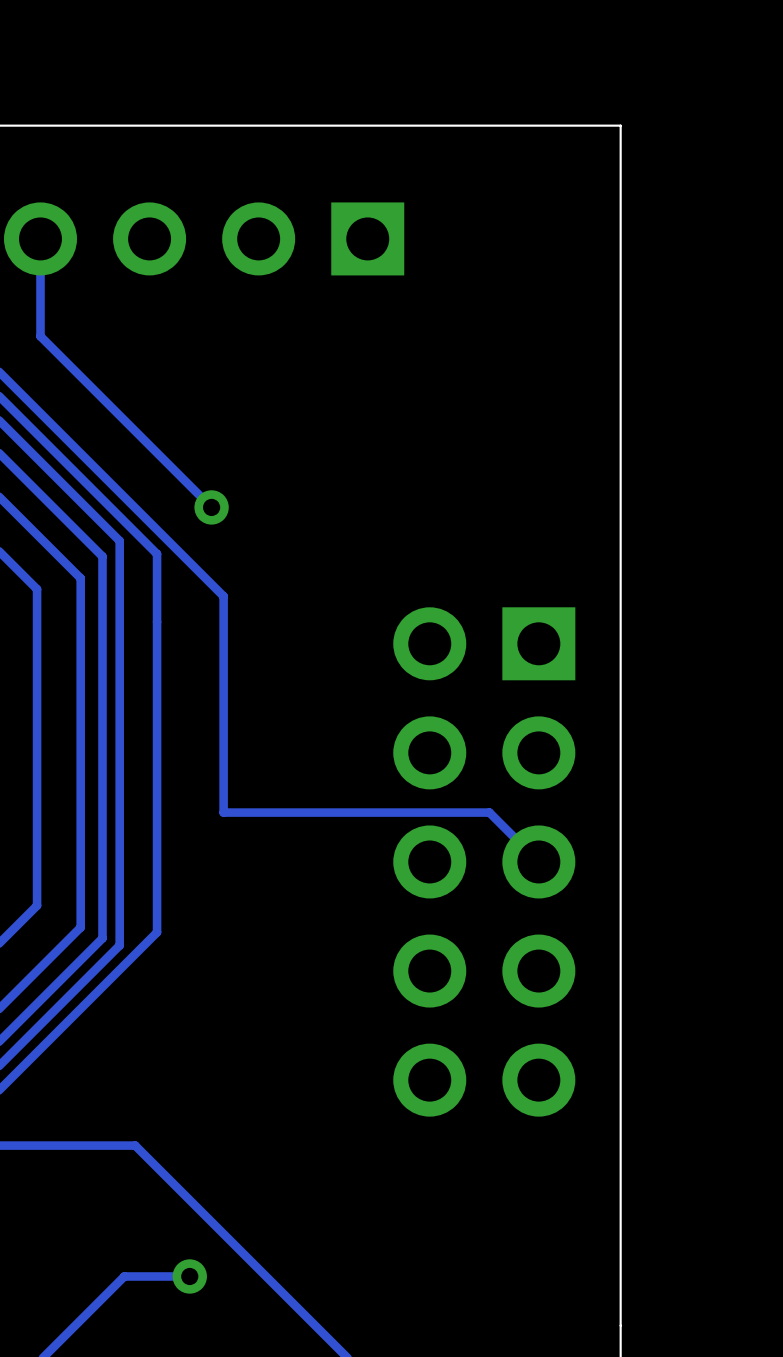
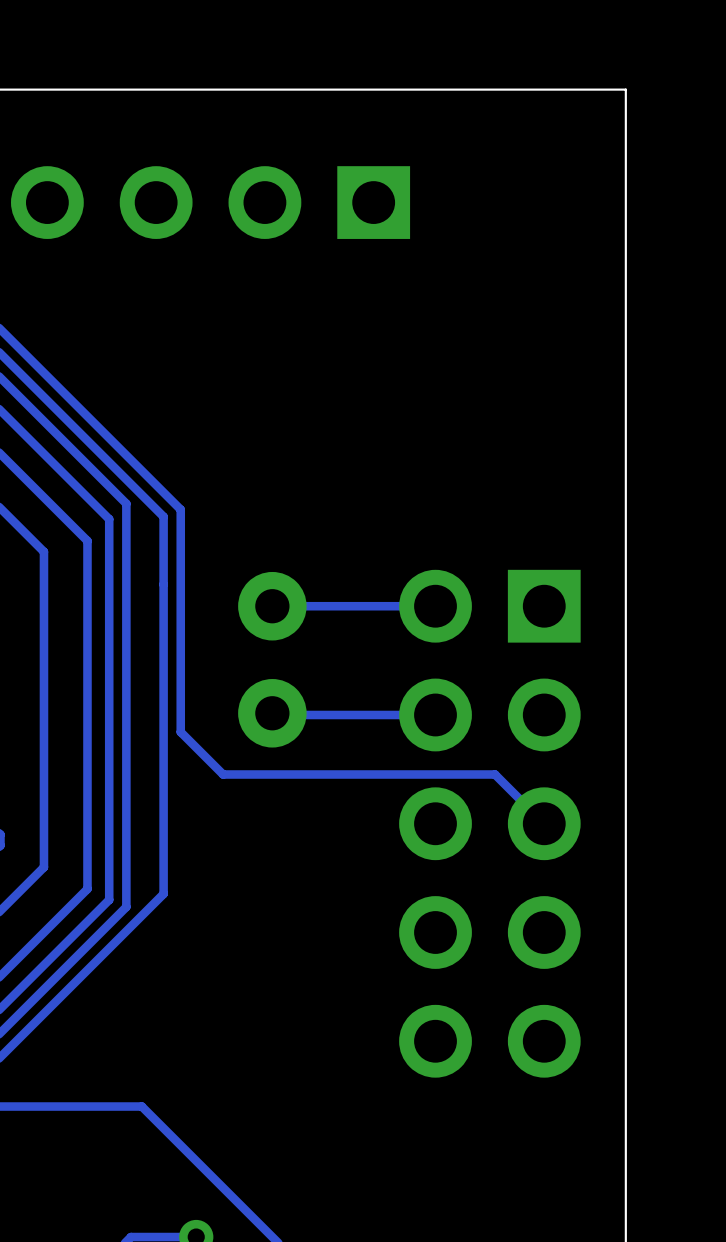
track: (40, 238) (40, 336) (211, 507) -> none
via: (211, 507) -> none
track: (174, 546) (223, 596) (223, 812) -> (180, 509) (180, 732) (223, 774) (229, 774)
track: none -> (435, 606) (272, 606)
part: none -> (272, 659)
track: none -> (272, 713) (274, 714) (435, 714)

